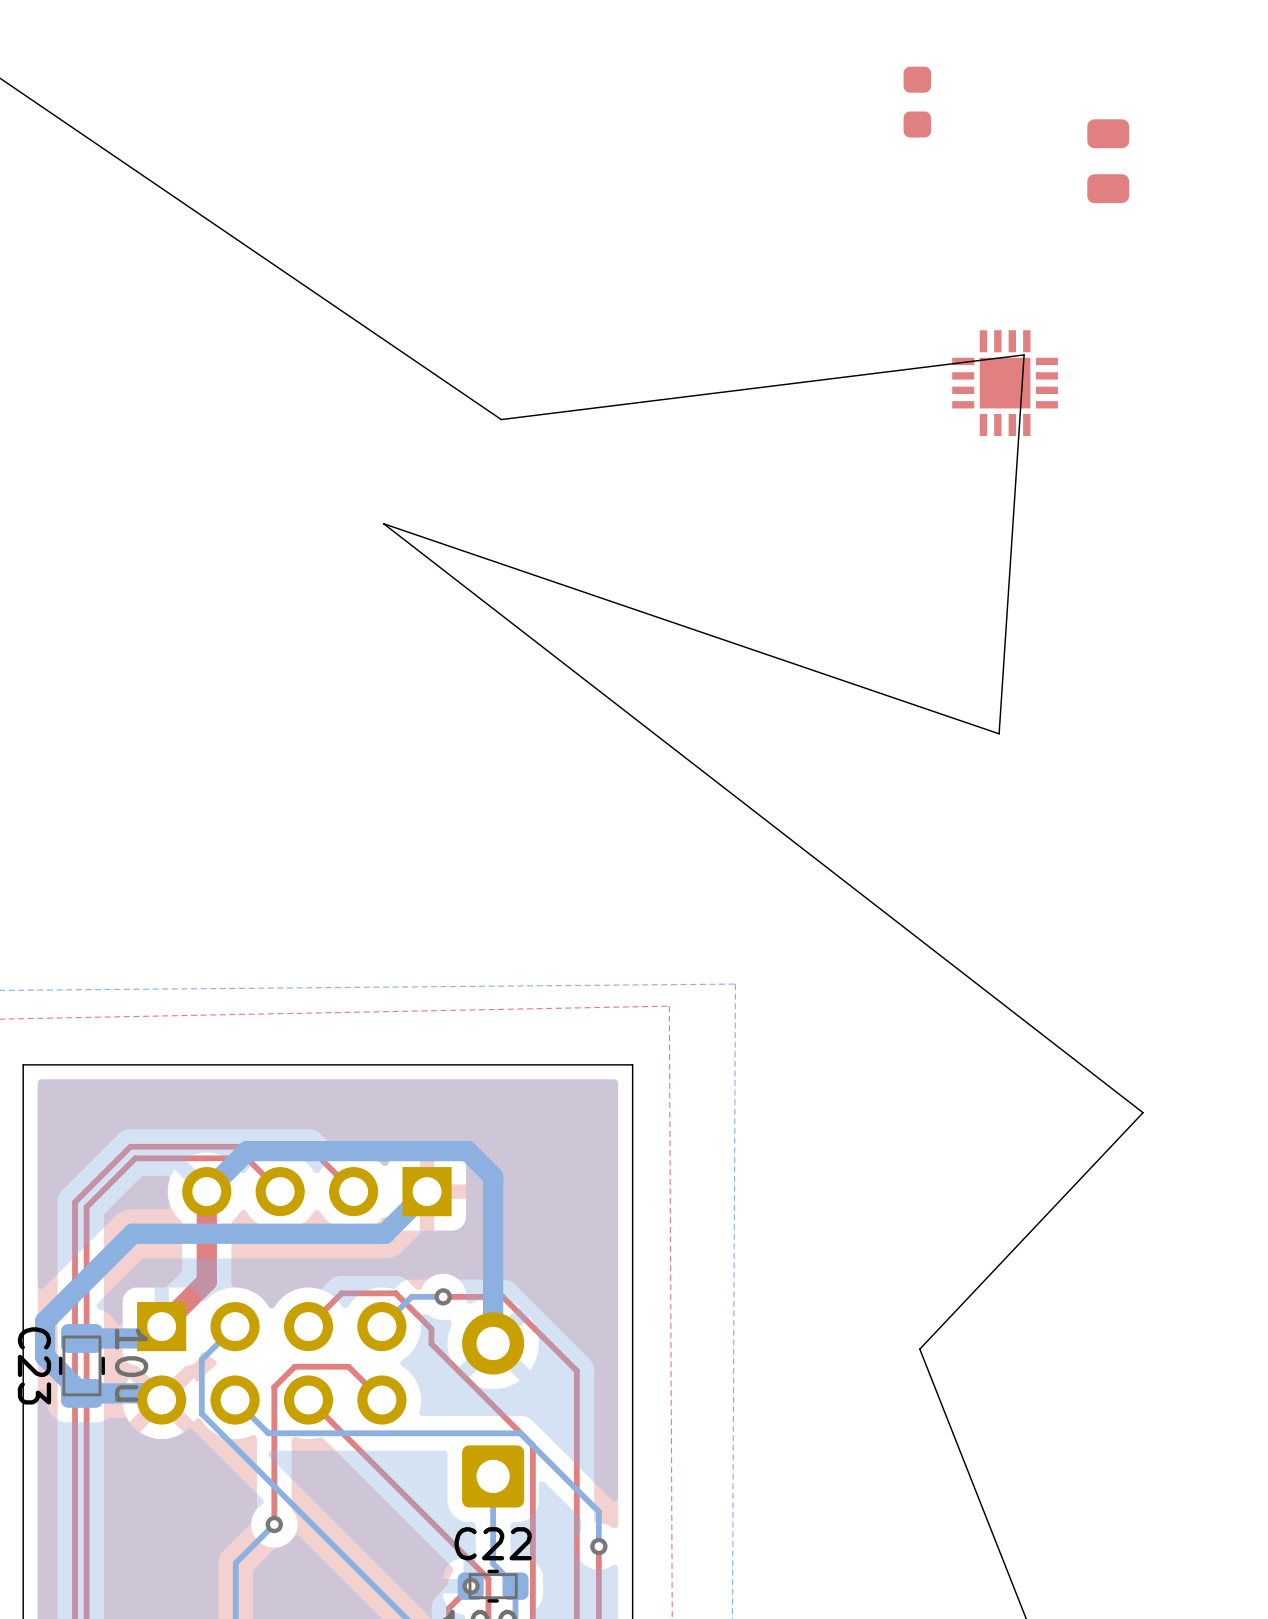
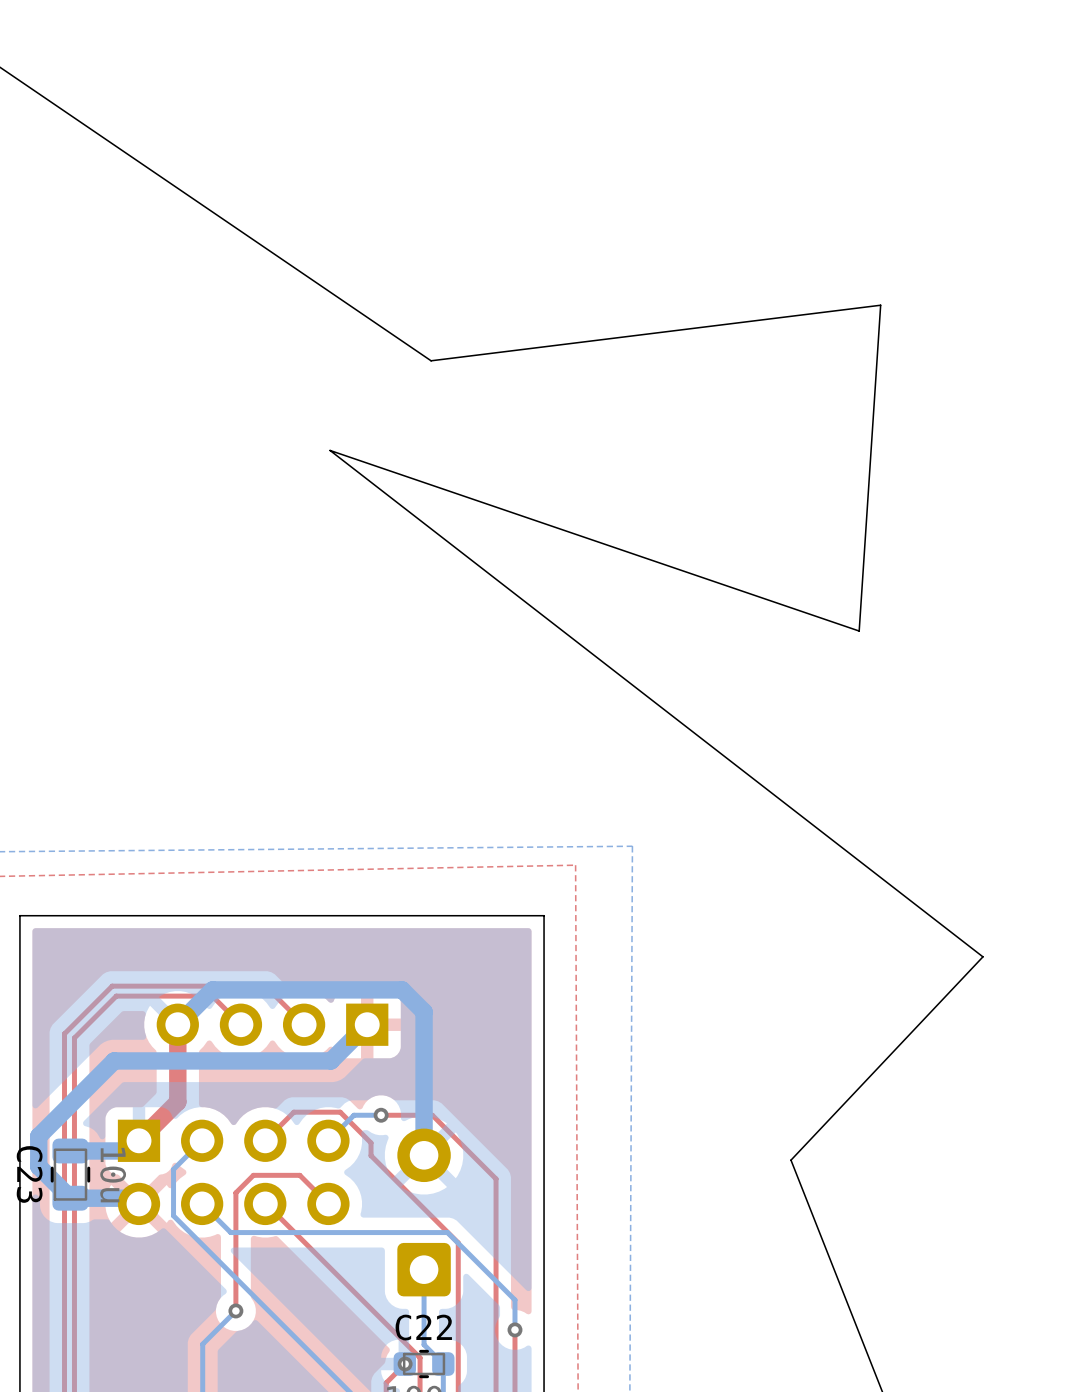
part: (917, 102) -> none
part: (1108, 161) -> none
part: (1005, 383) -> none

